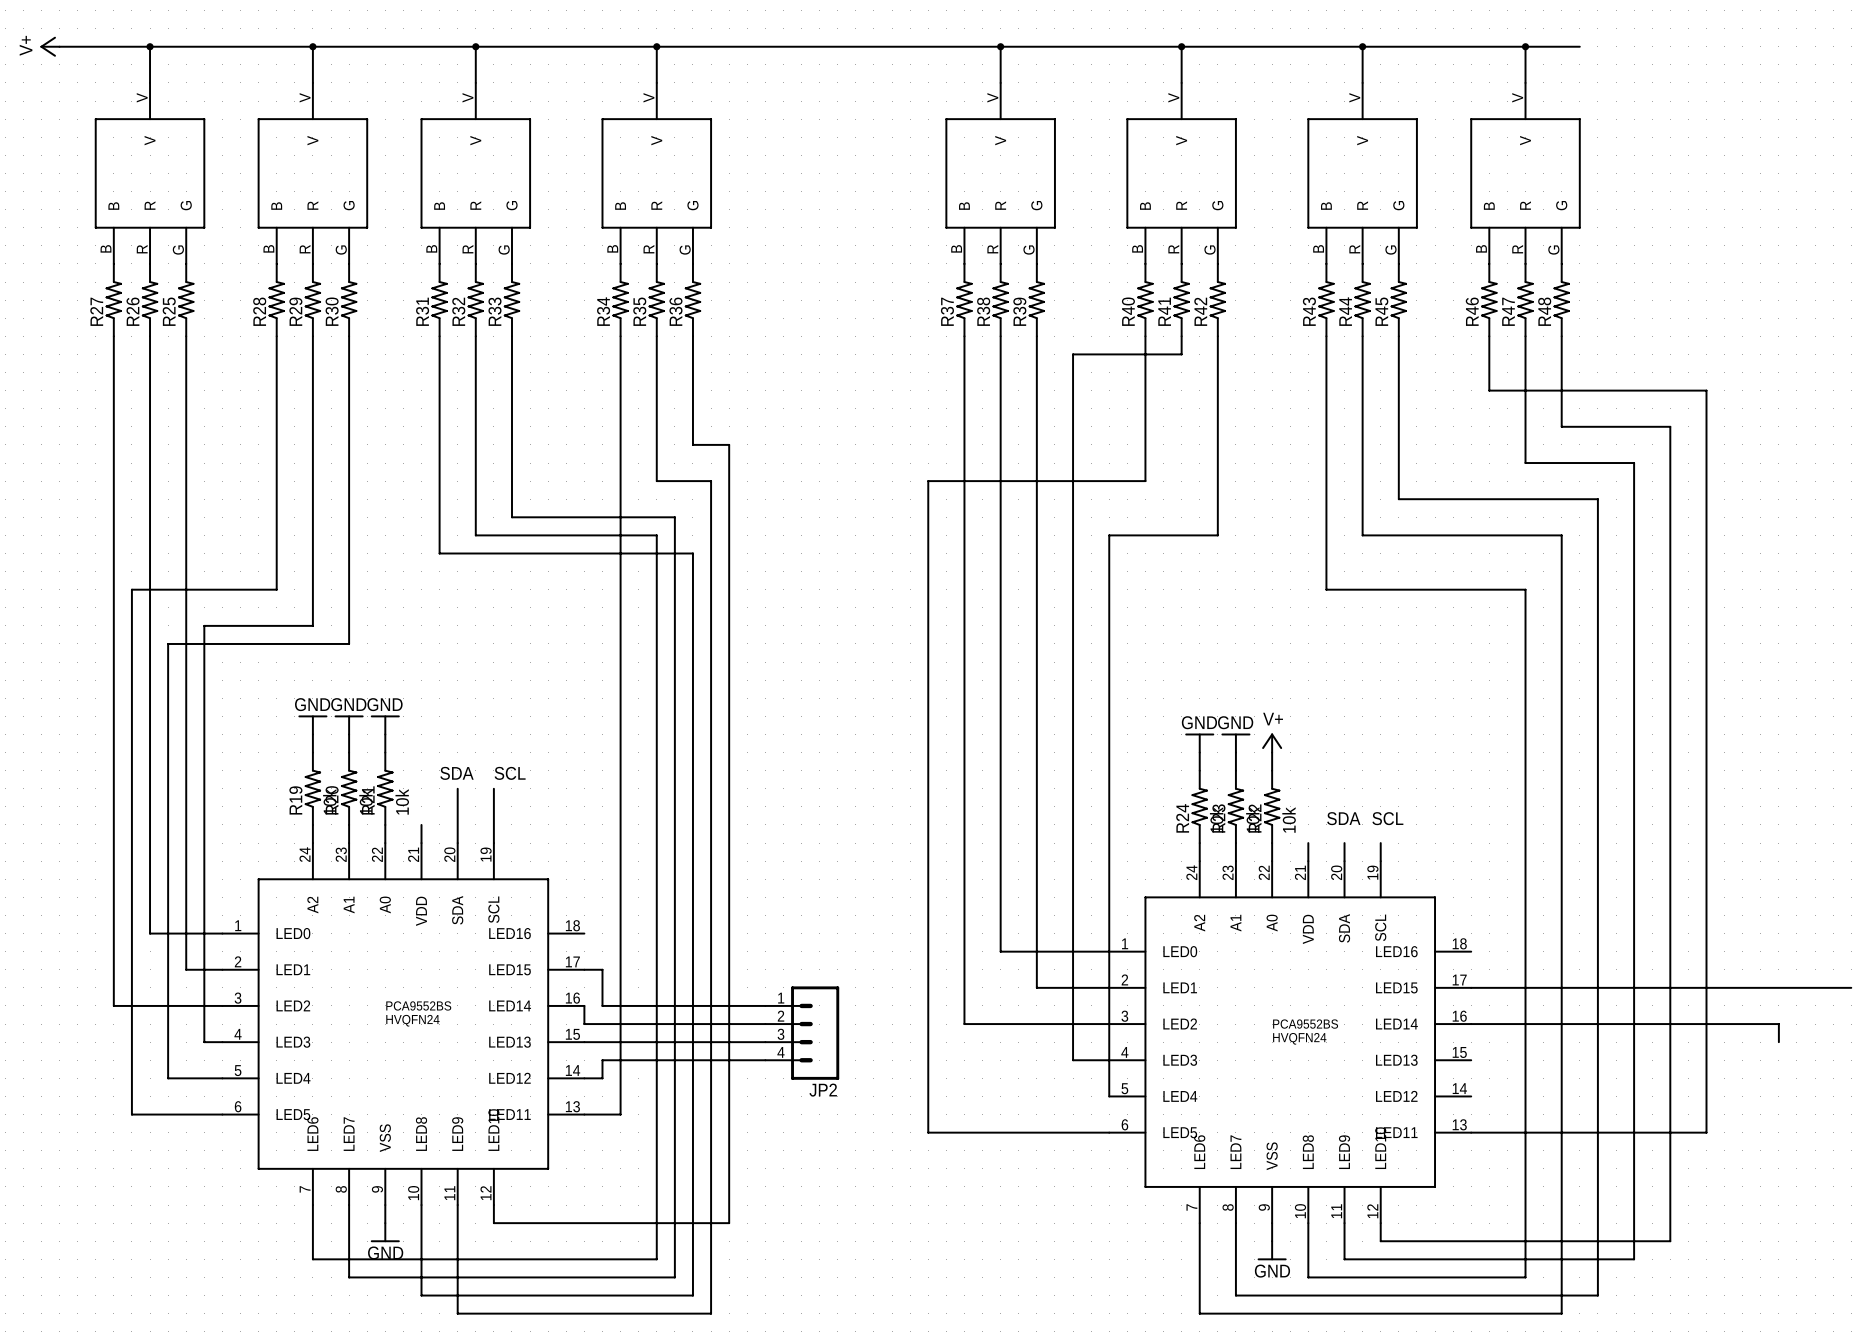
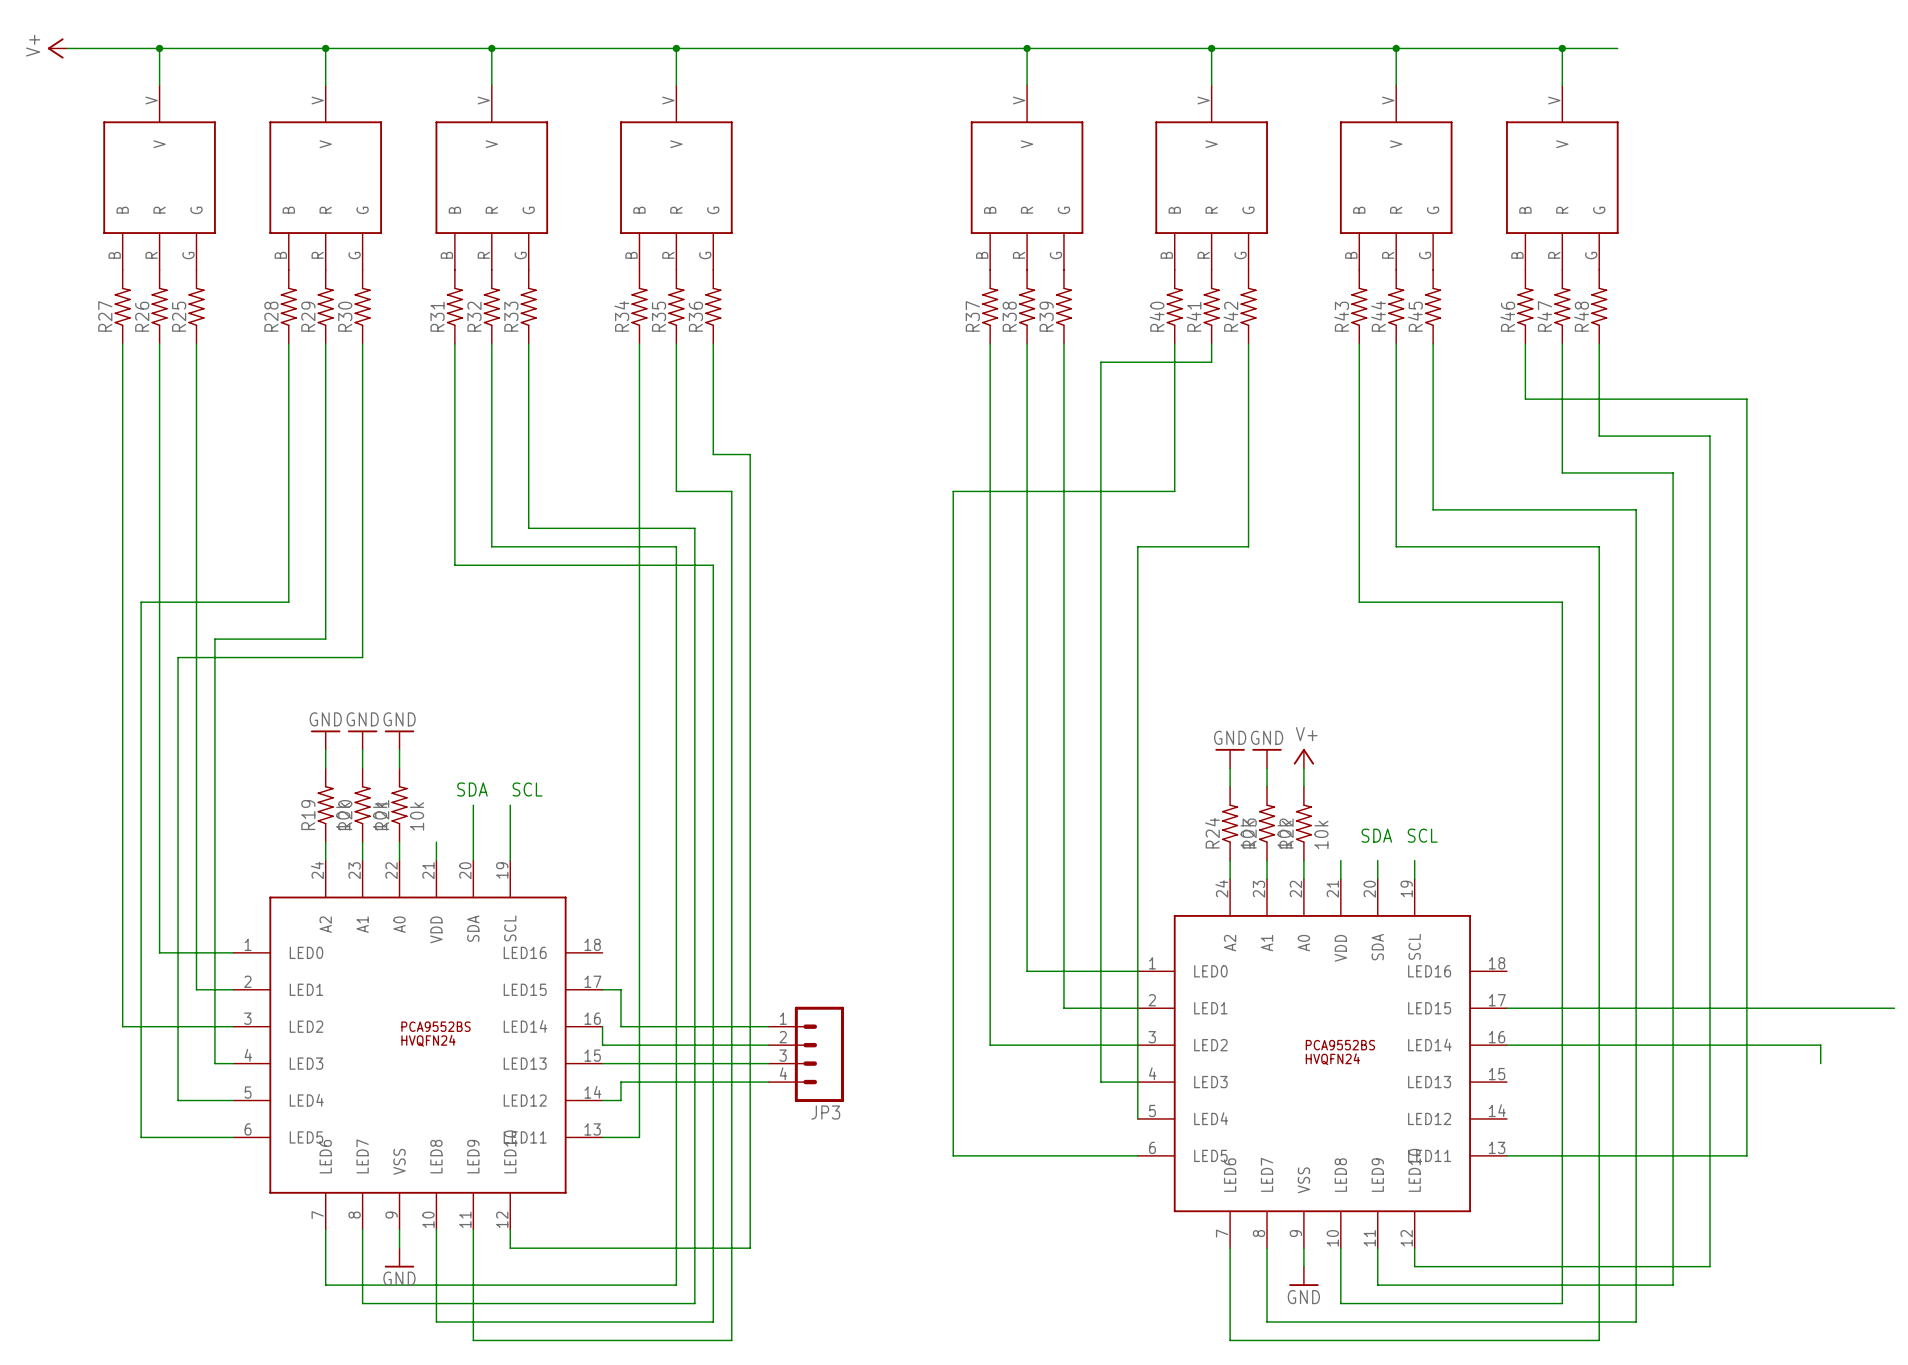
JP3: none -> (806, 1054)
JP2: (802, 1033) -> none

